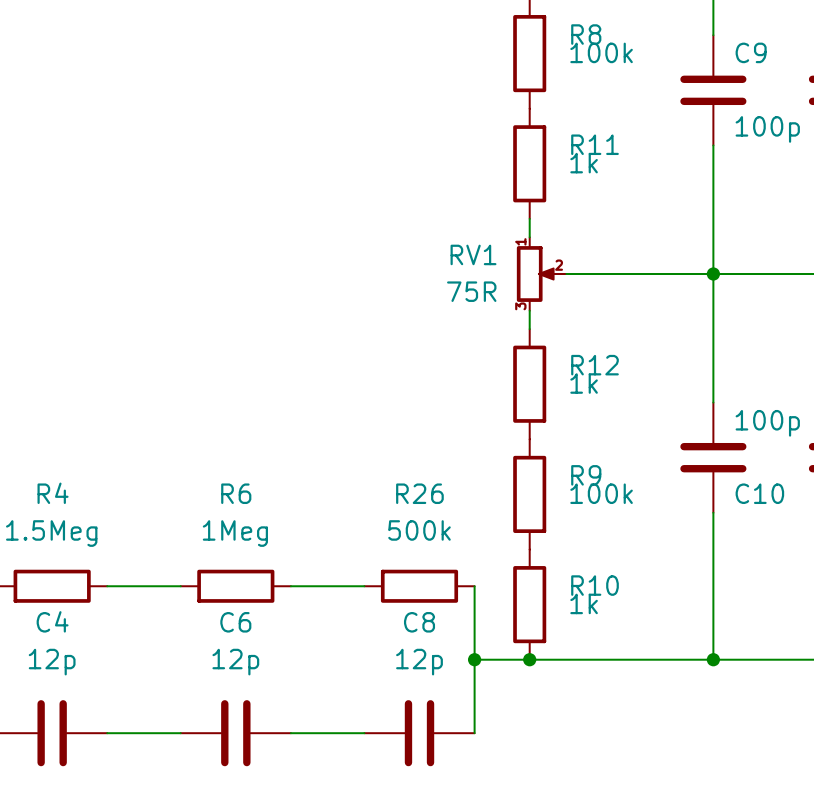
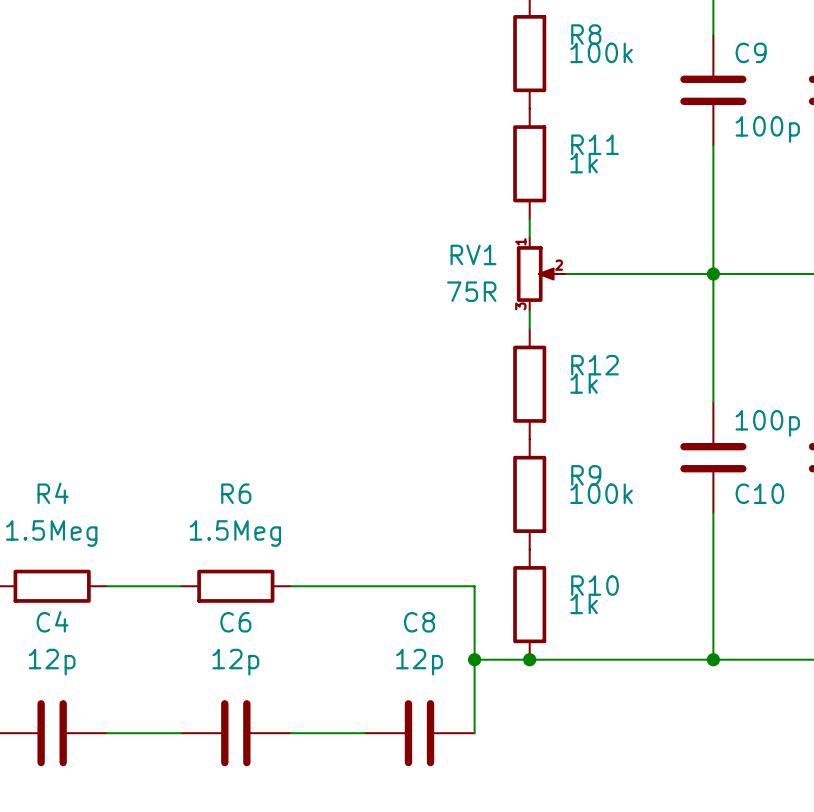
R6 value: 1Meg (235, 533) -> 1.5Meg (235, 533)
wire: none -> (364, 586) (474, 586)
R26: 500k (419, 586) -> none

